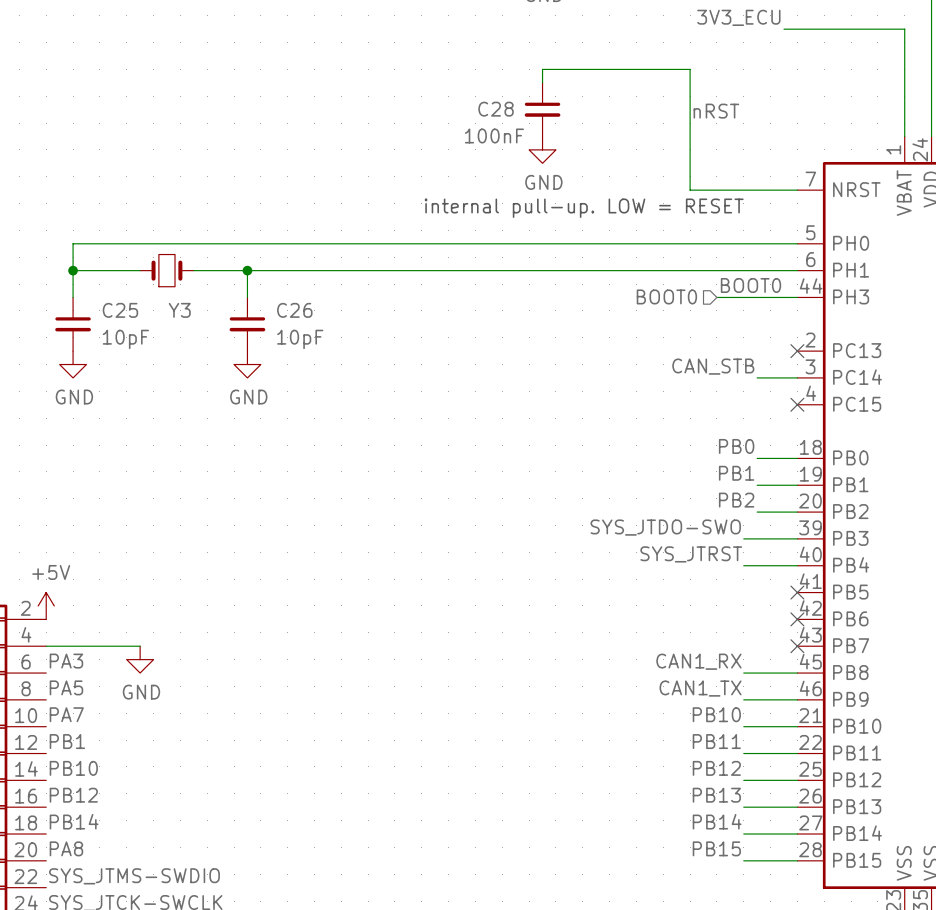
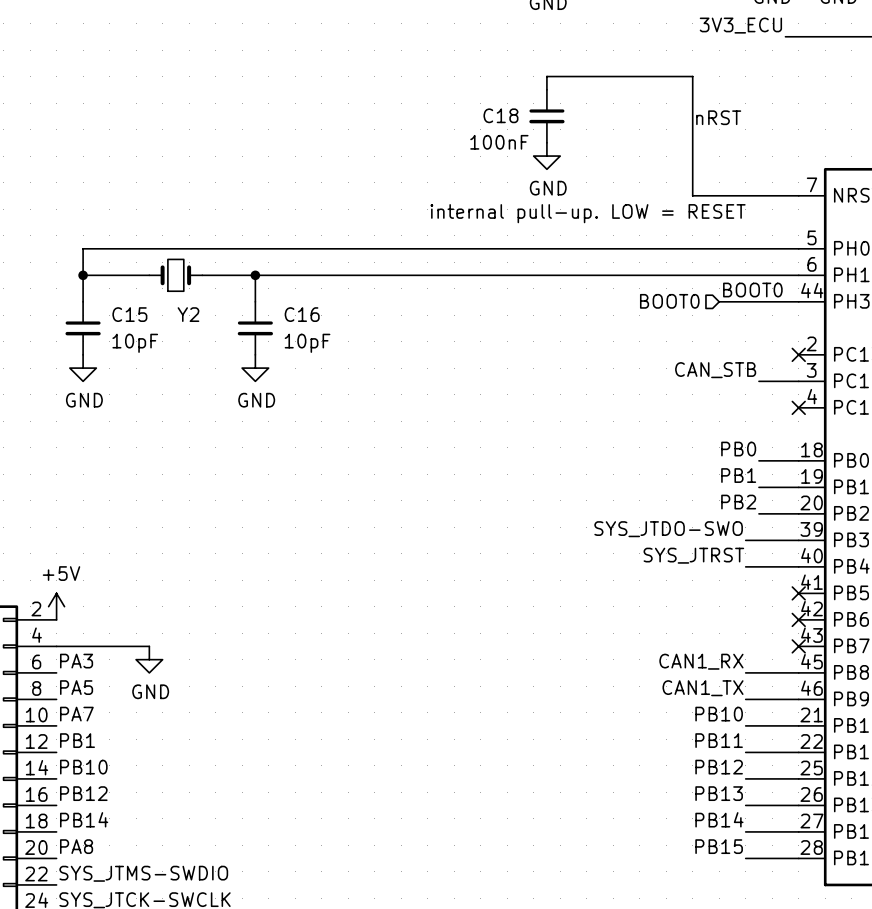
C28 name: C28 (496, 109) -> C18 (500, 115)
C25 name: C25 (120, 310) -> C15 (129, 314)
Y3 name: Y3 (179, 310) -> Y2 (188, 314)
C26 name: C26 (294, 310) -> C16 (302, 314)

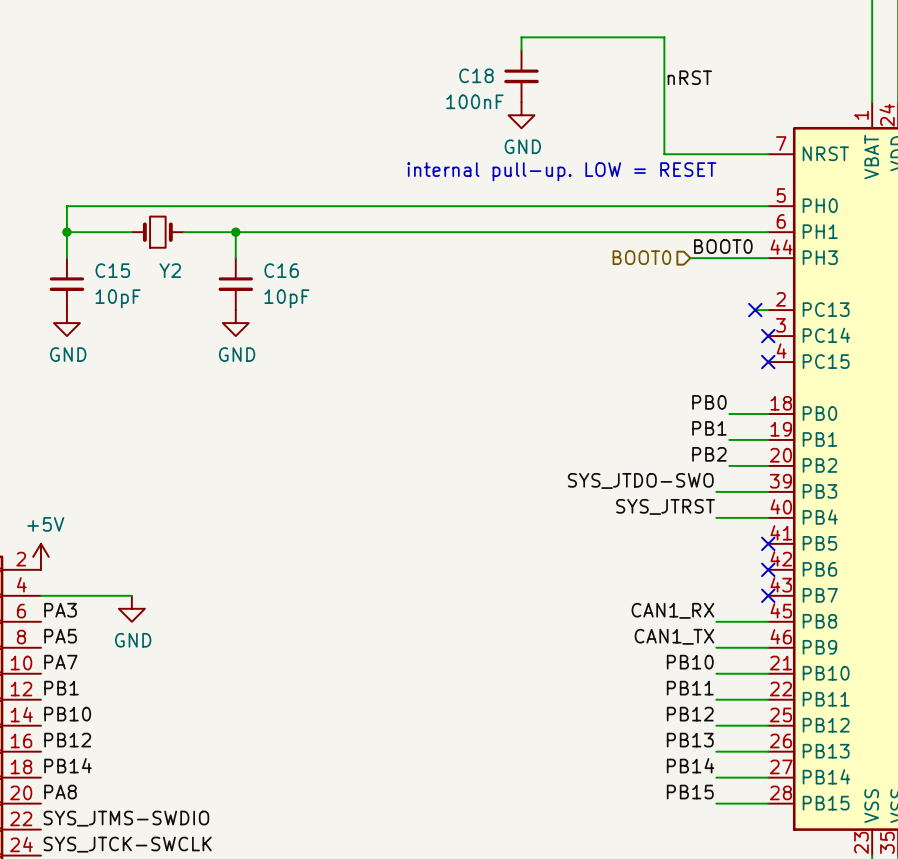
wire: none -> (755, 310) (768, 310)
no-connect mark: none -> (755, 310)
no-connect mark: (798, 354) -> none
label: CAN_STB (715, 370) -> none
wire: (758, 381) (798, 381) -> none
no-connect mark: none -> (768, 336)

